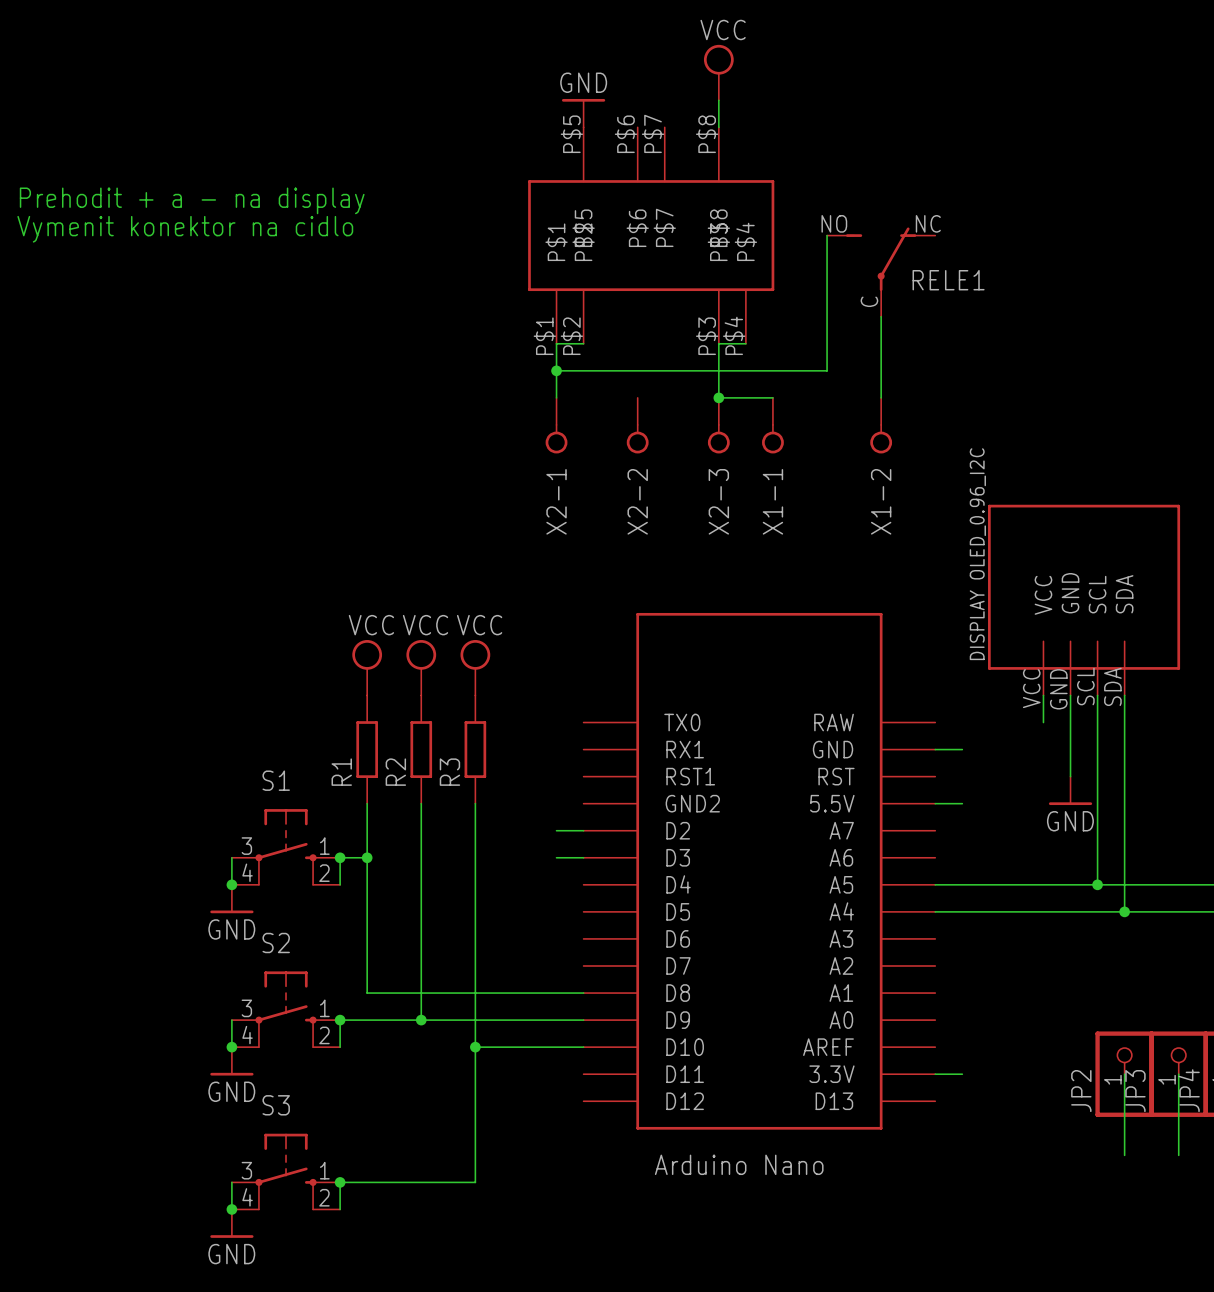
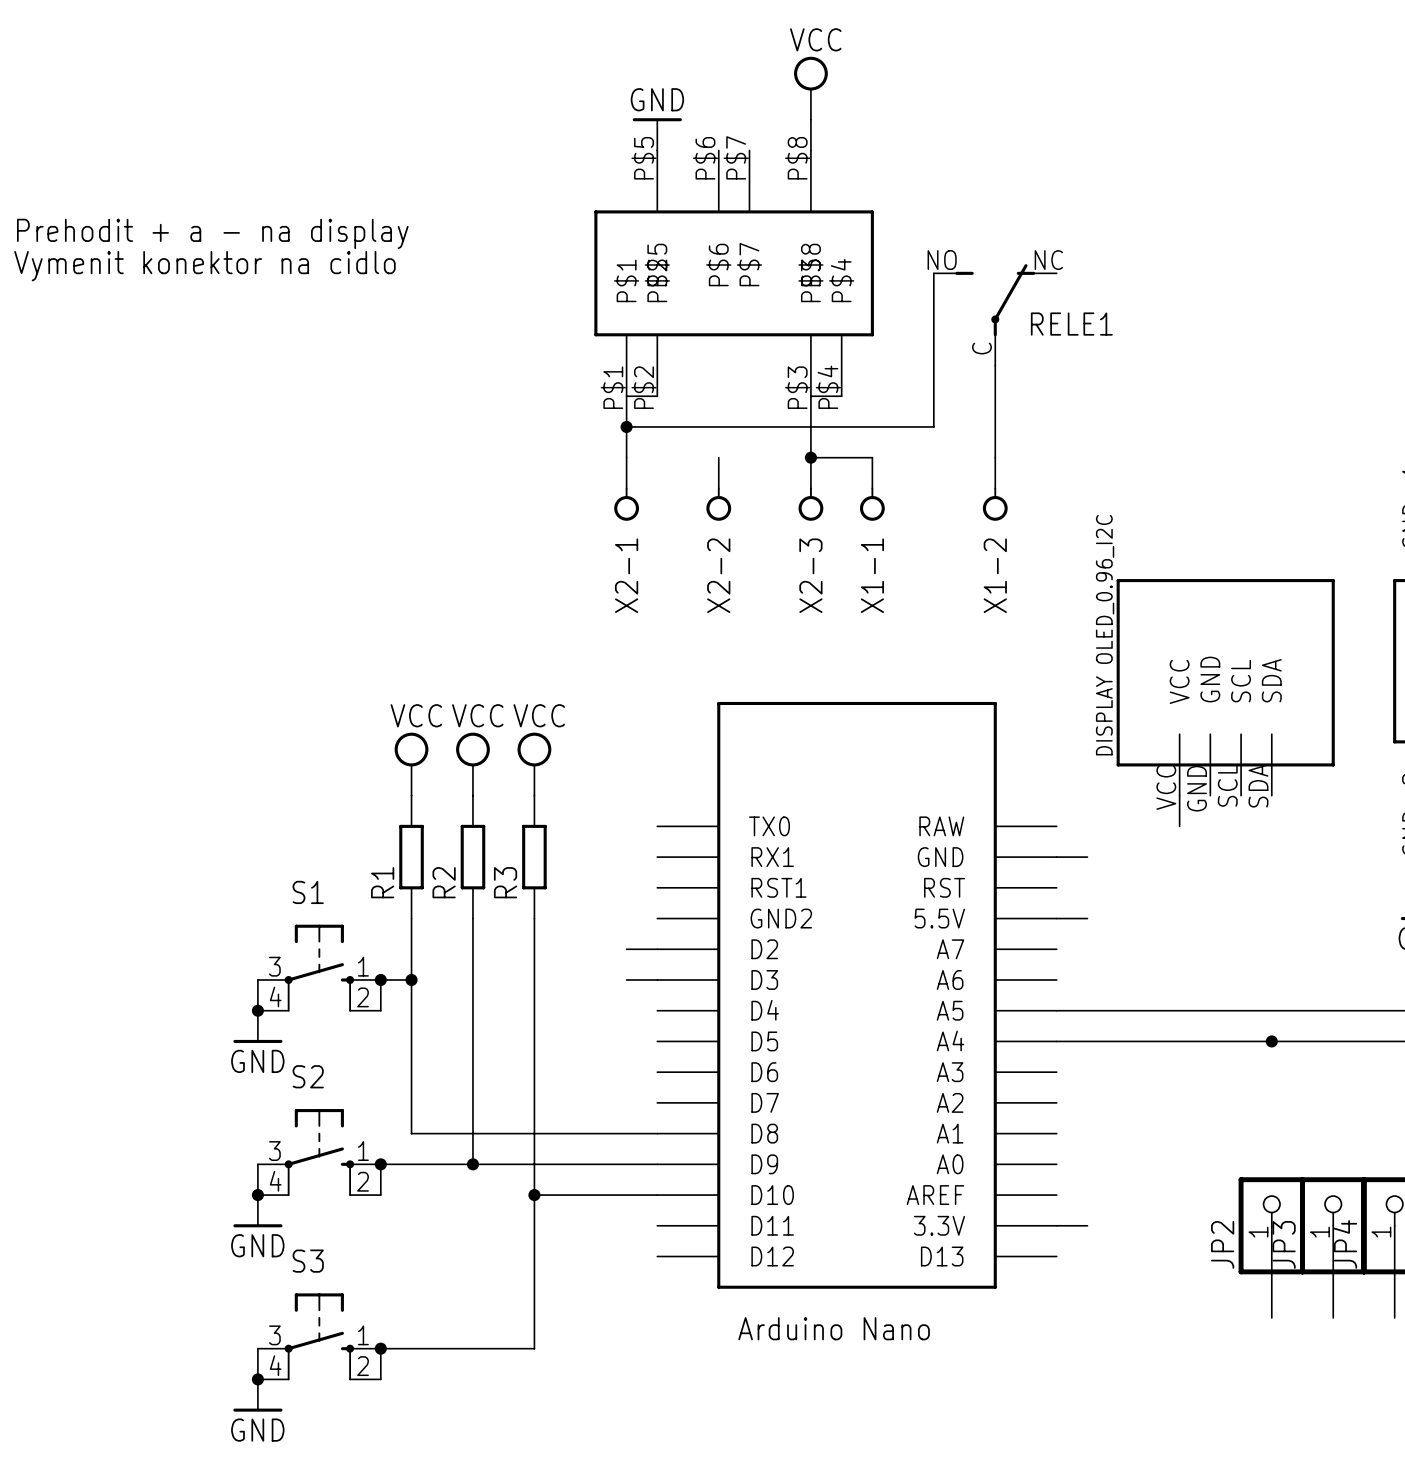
wire: (1070, 695) (1070, 776) -> none
wire: (1097, 695) (1097, 884) -> none
wire: (1124, 695) (1124, 911) -> none
power symbol: GND (1070, 790) -> none
junction: (1097, 884) -> none

